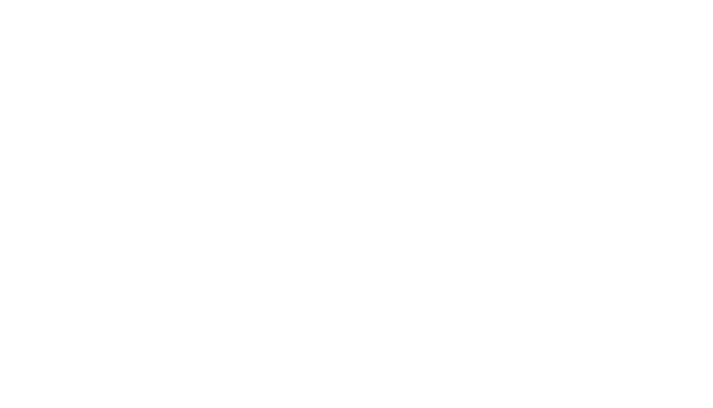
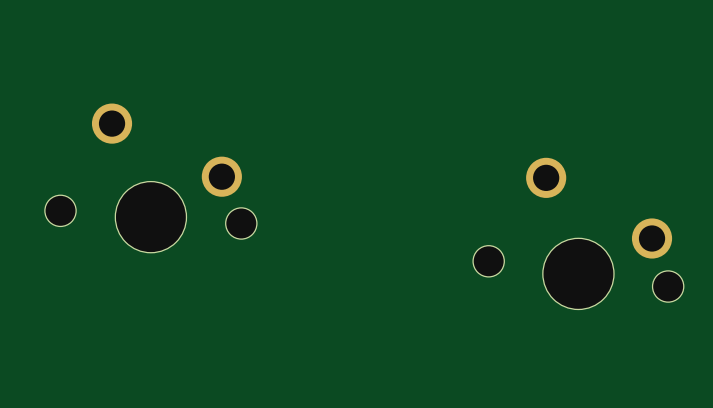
part: none -> (150, 178)
part: none -> (578, 233)

